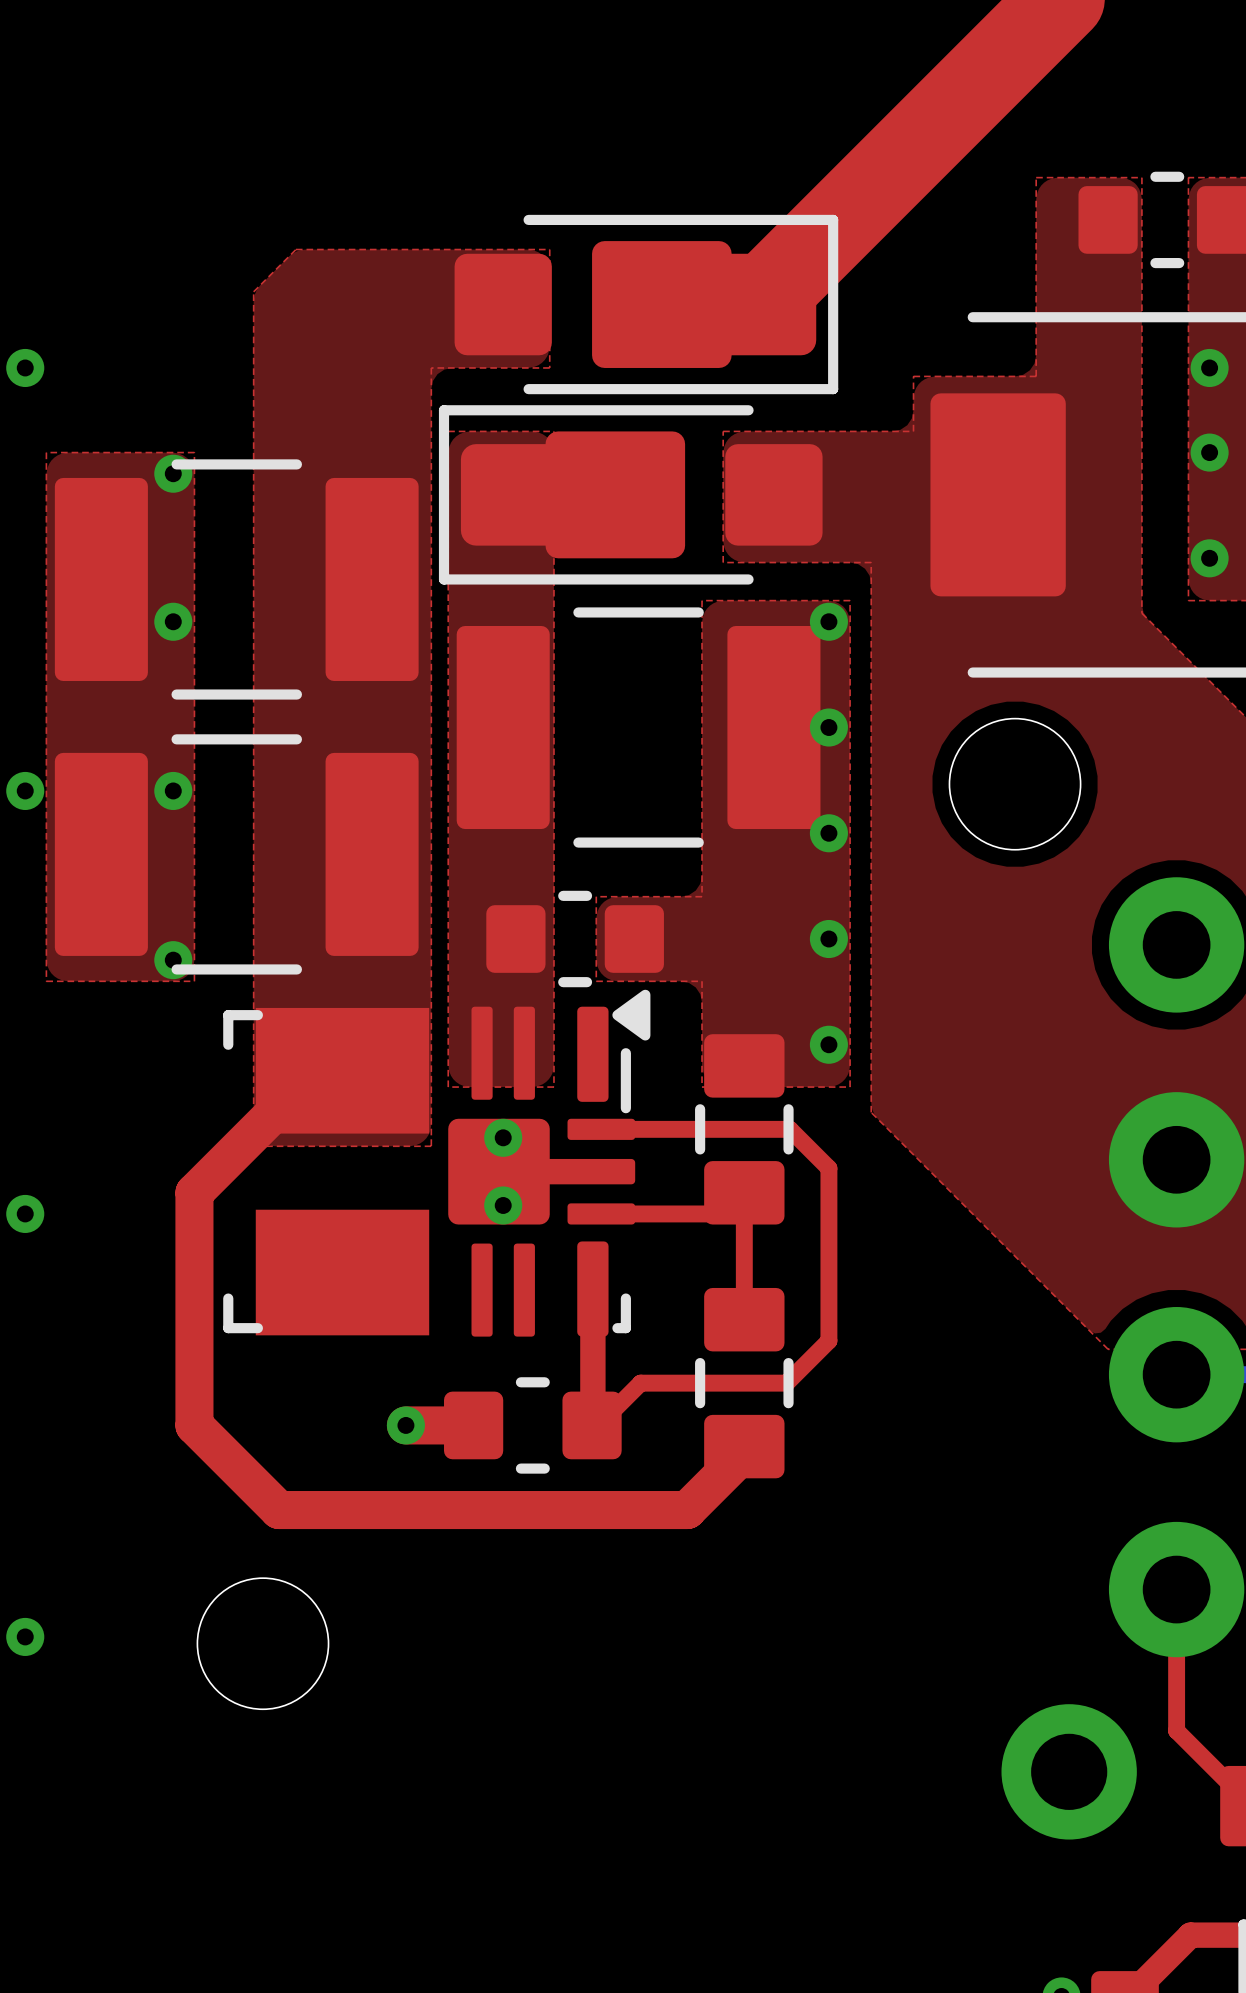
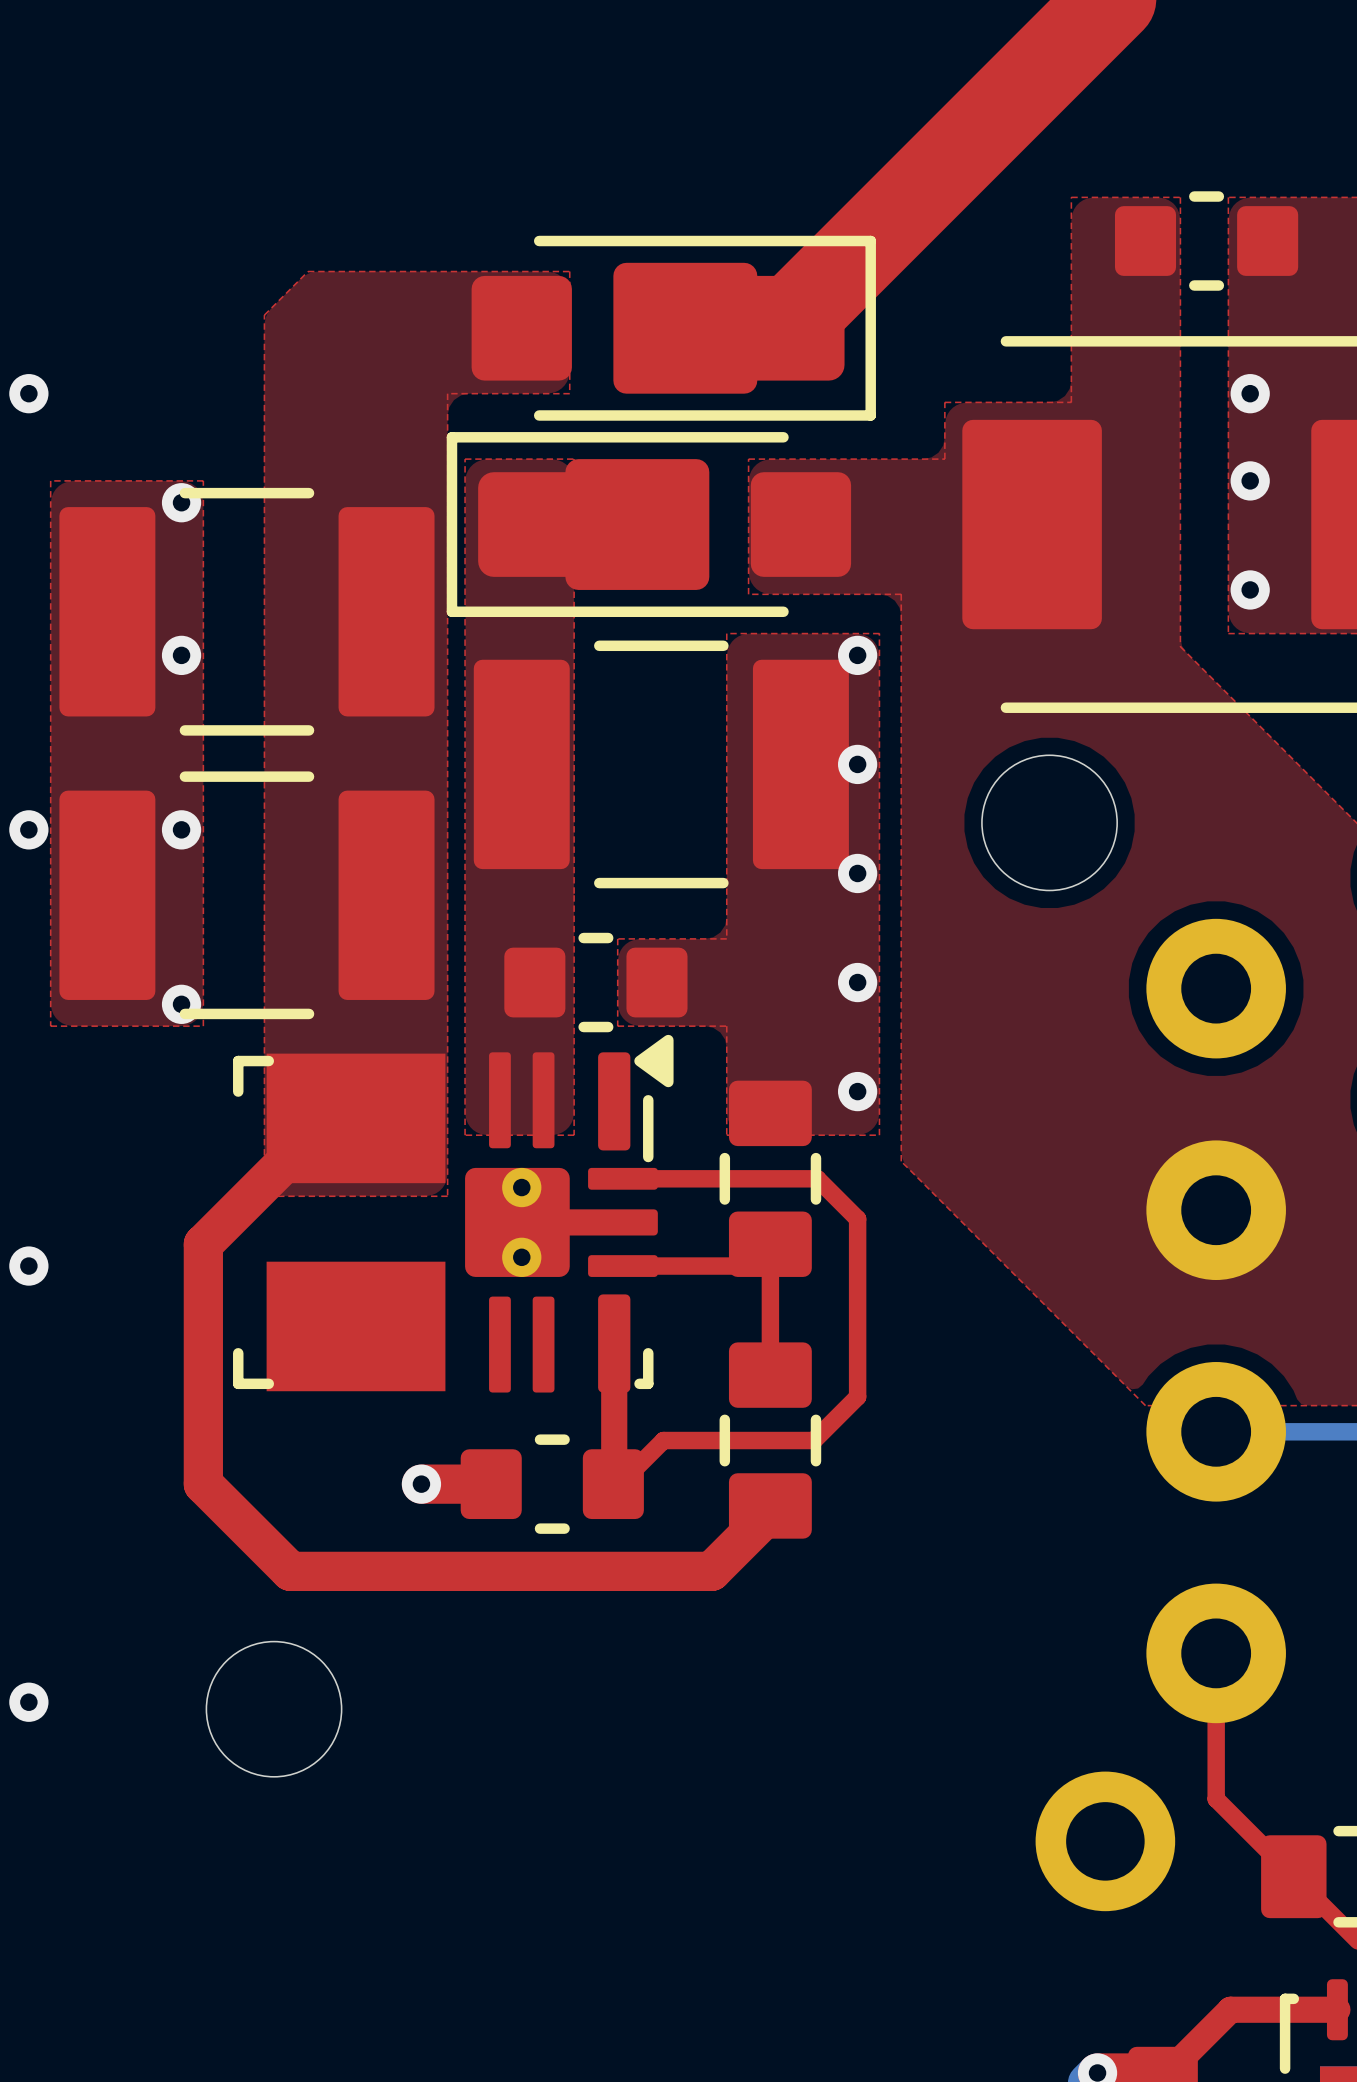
part footprint: [454, 214, 839, 395] -> [471, 235, 876, 421]
part footprint: [438, 405, 823, 585] -> [446, 432, 852, 618]

